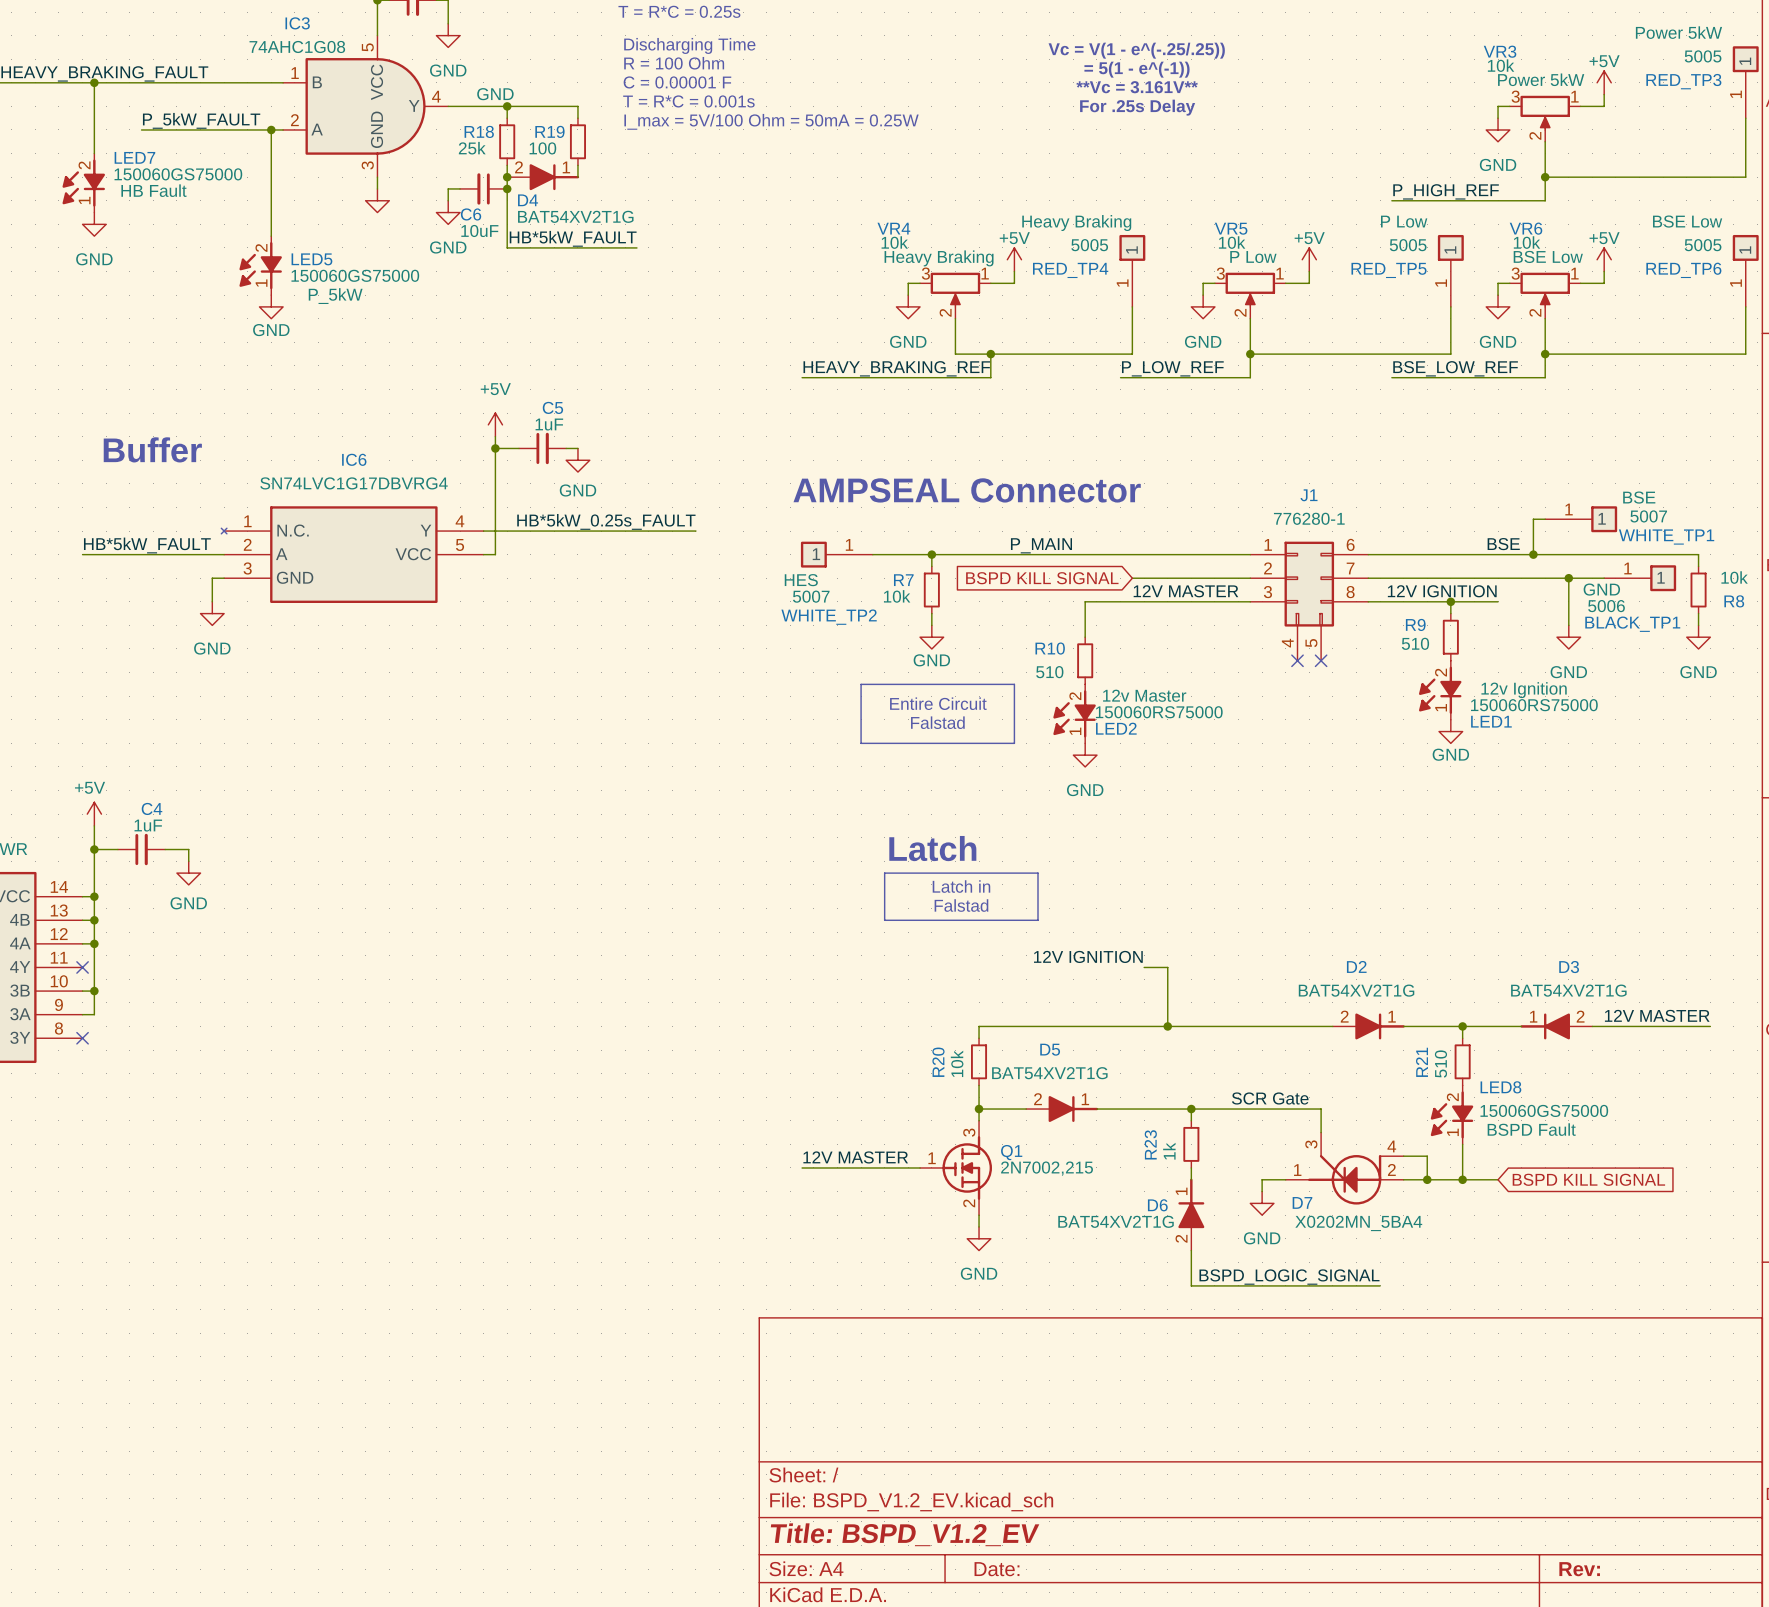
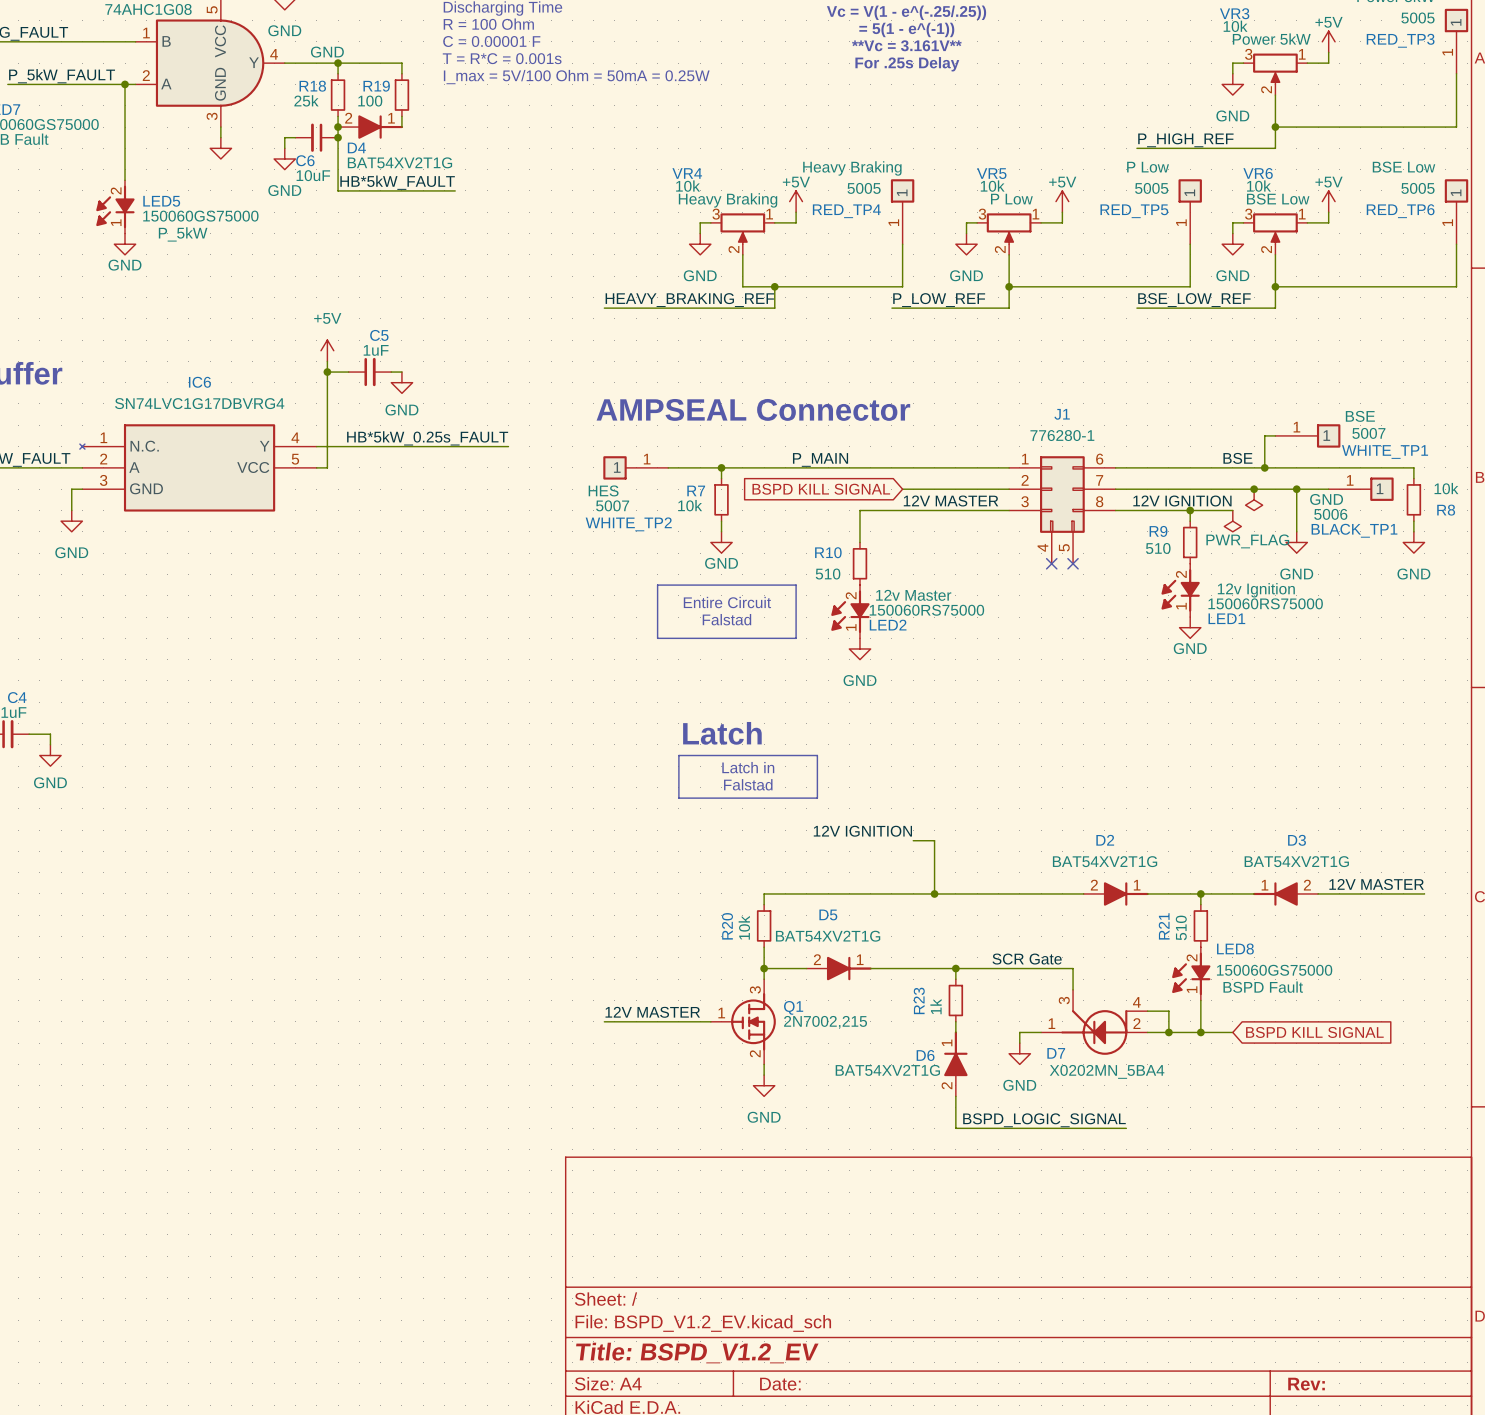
junction: none -> (1254, 489)
power symbol: none -> (1254, 499)
power symbol: none -> PWR_FLAG (1232, 521)

